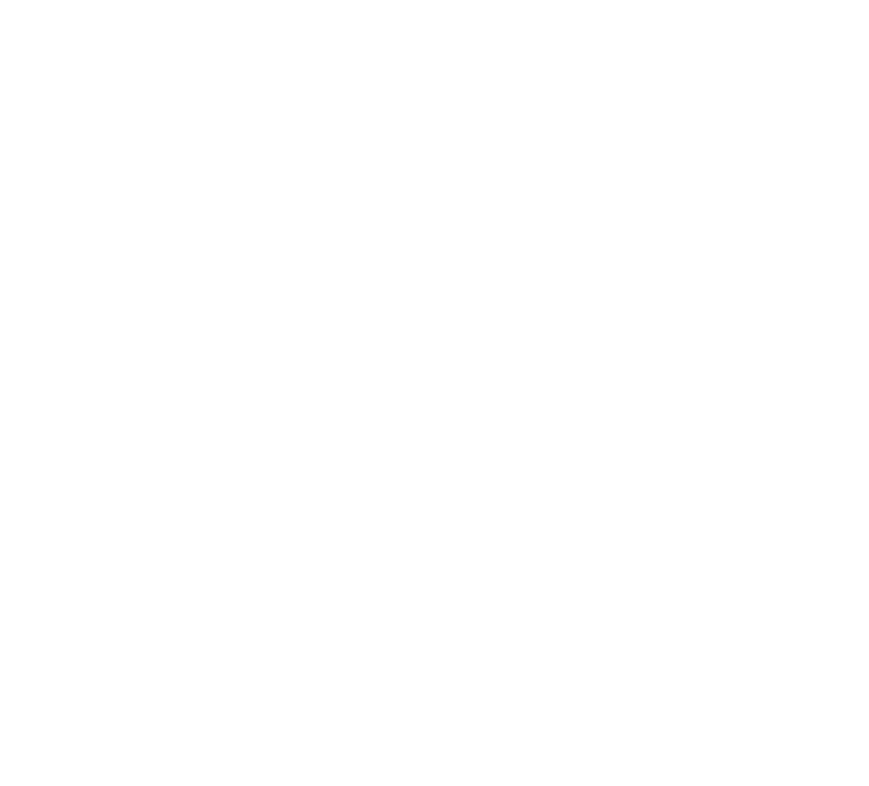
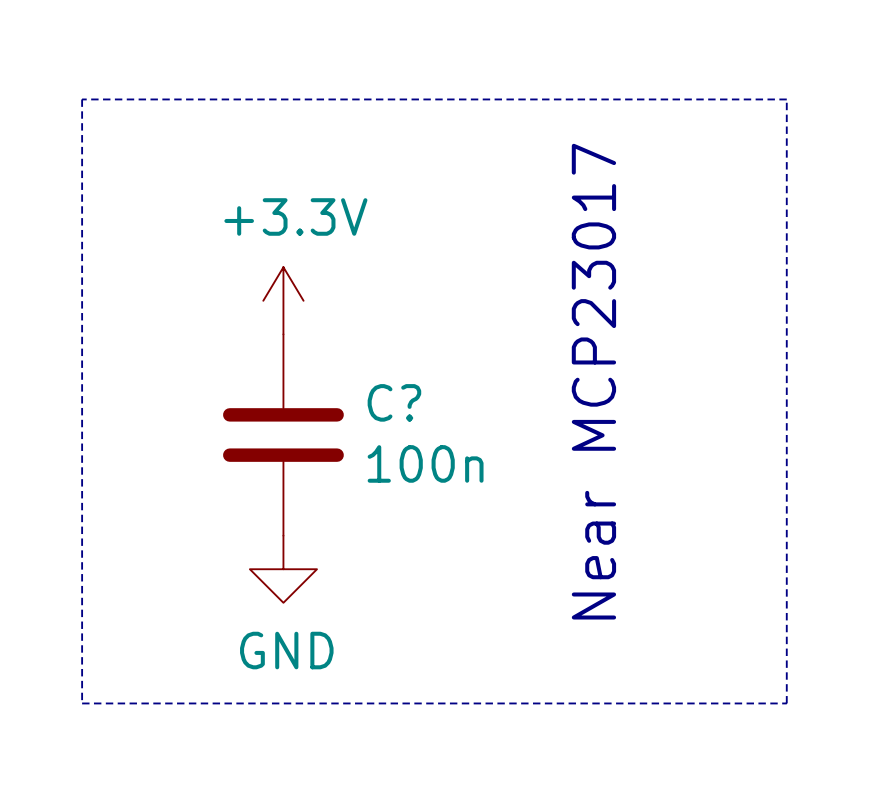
line: none -> (82, 99) (786, 99) (786, 703) (82, 703) (82, 99)
power symbol: none -> +3.3V (283, 300)
text: none -> Near MCP23017 (593, 381)
C?: none -> 100n (283, 435)
power symbol: none -> GND (283, 569)

